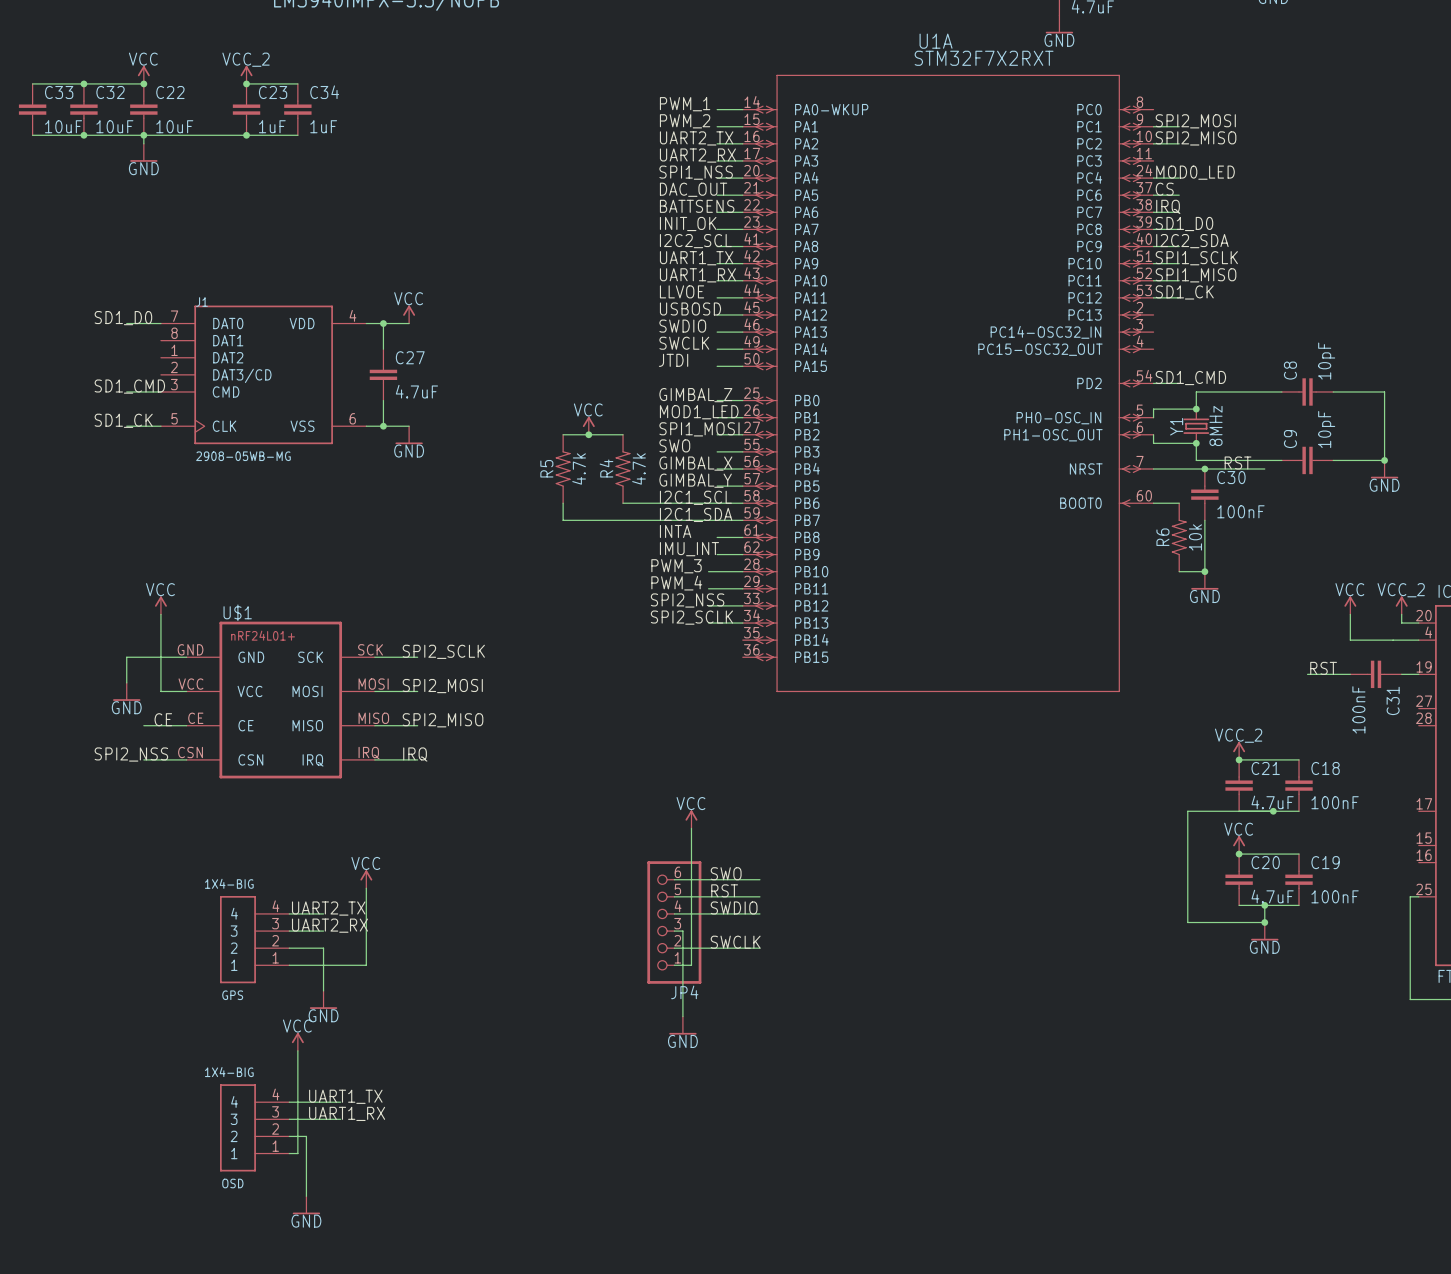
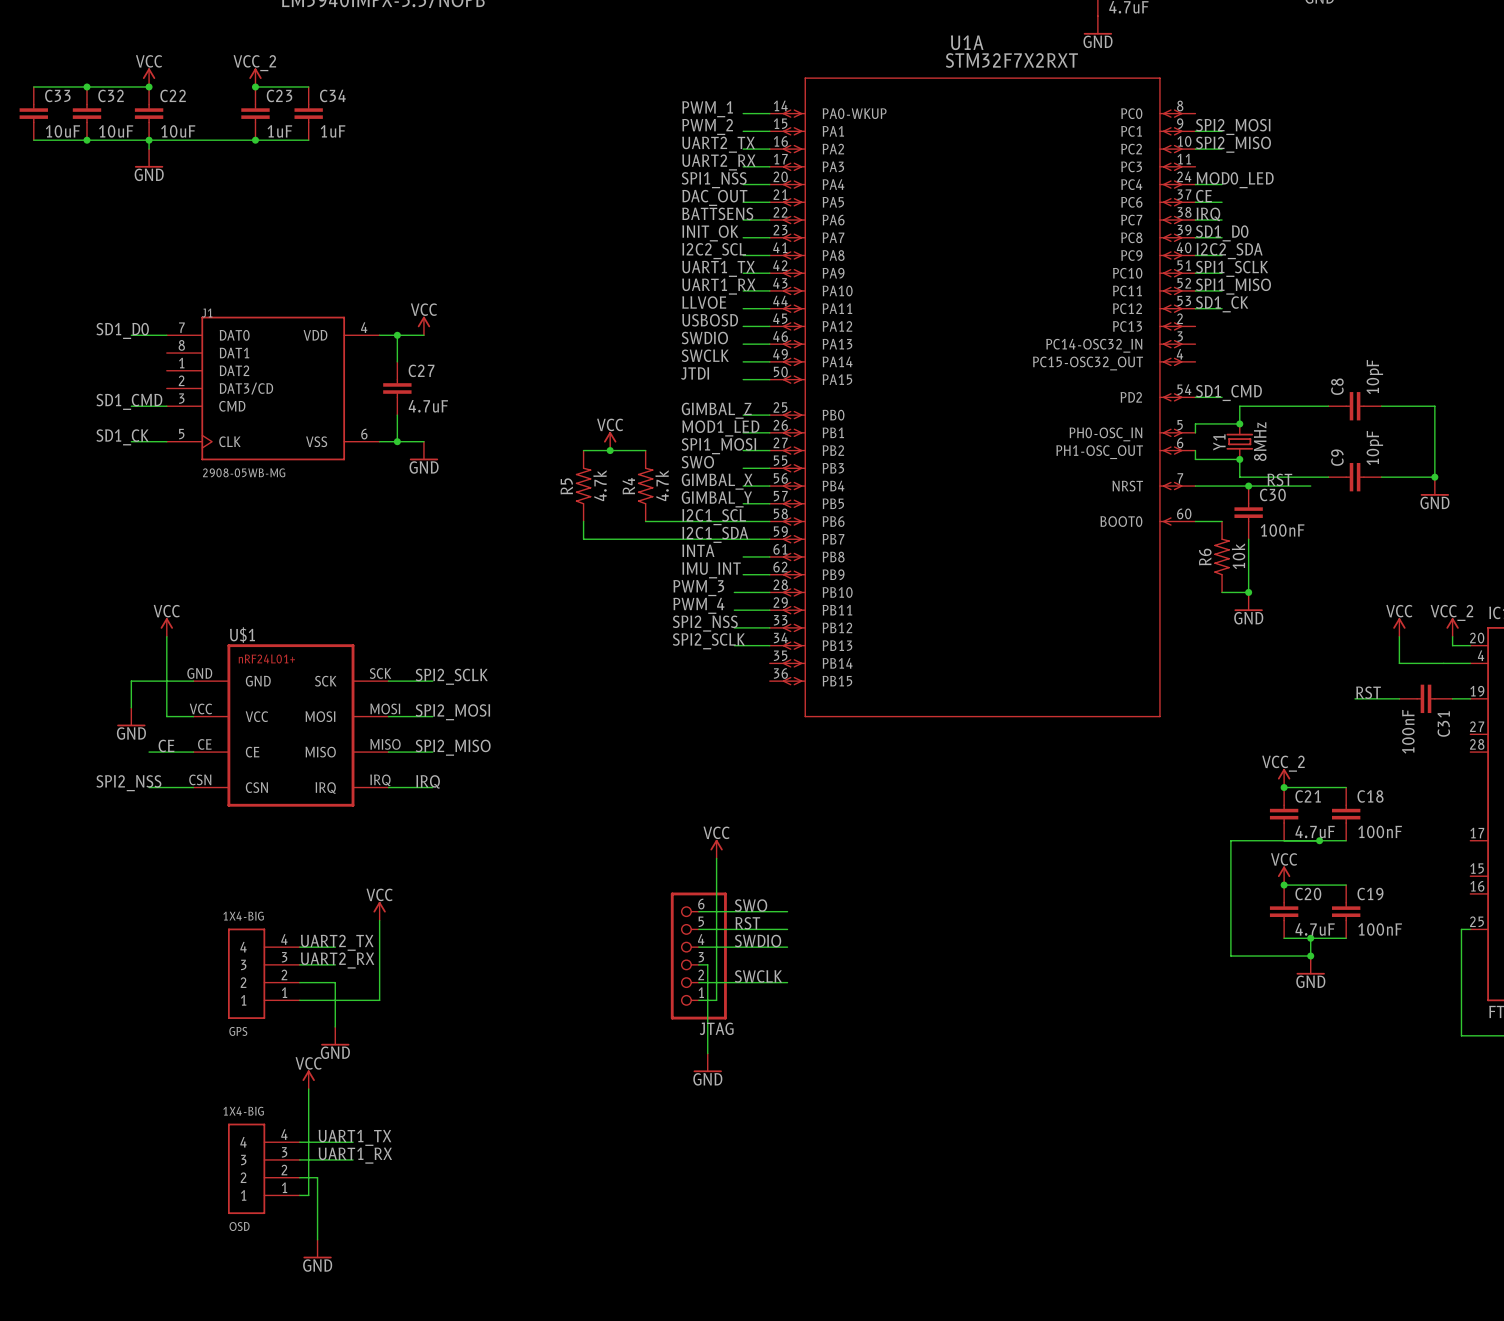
label: CS (1164, 189) -> CE (1204, 196)
JP4 name: JP4 (684, 992) -> JTAG (716, 1028)

